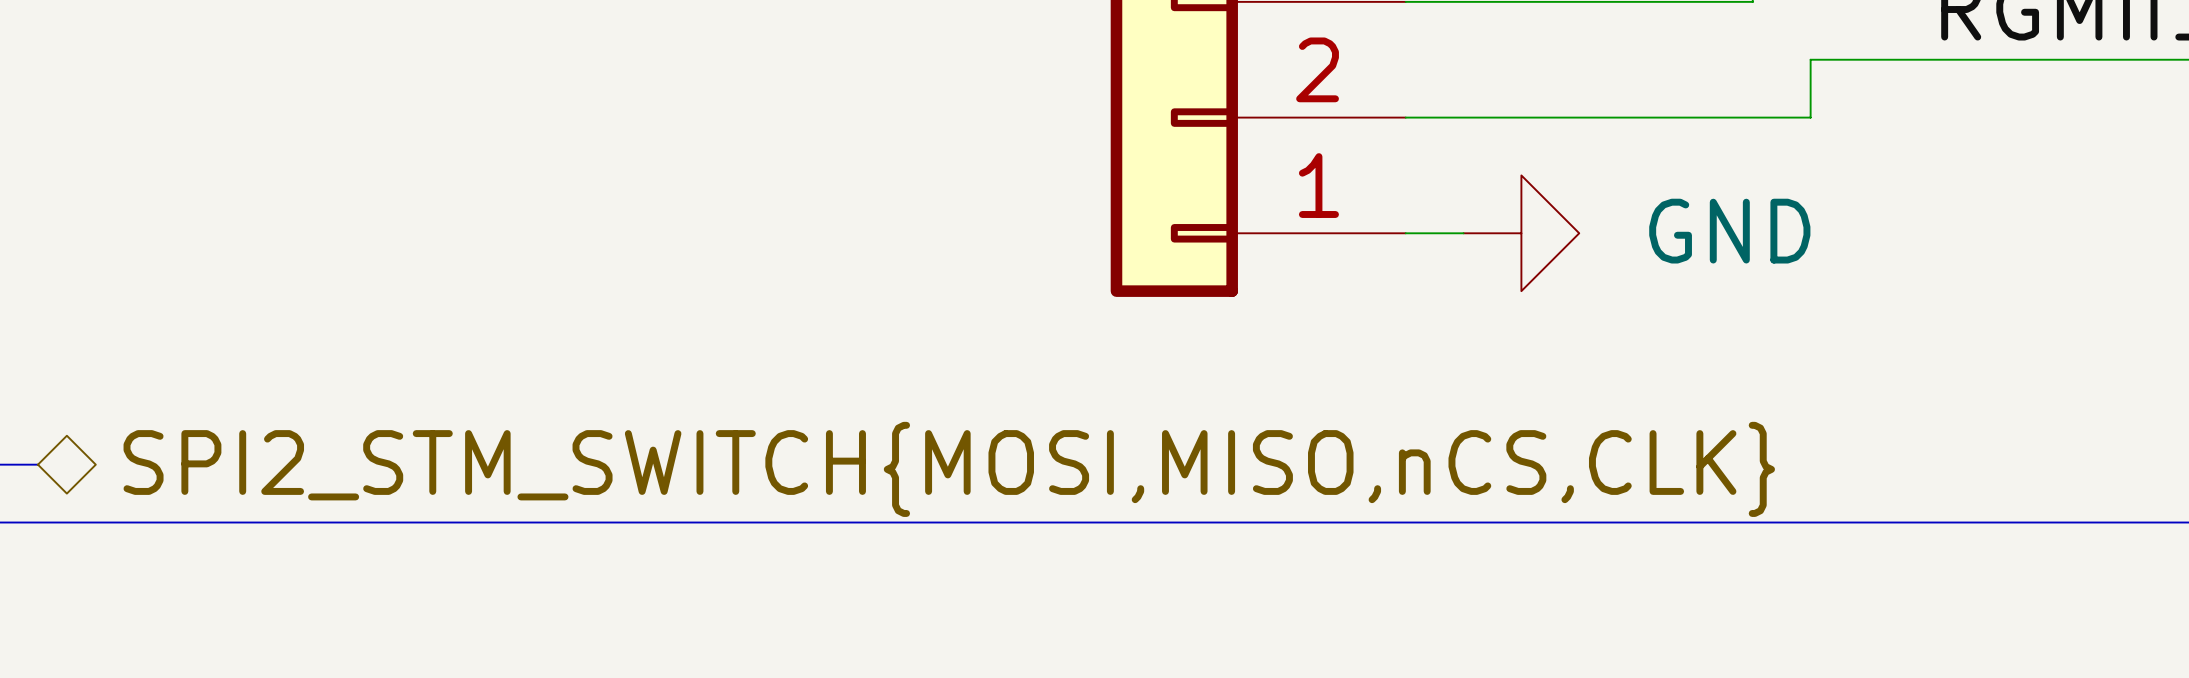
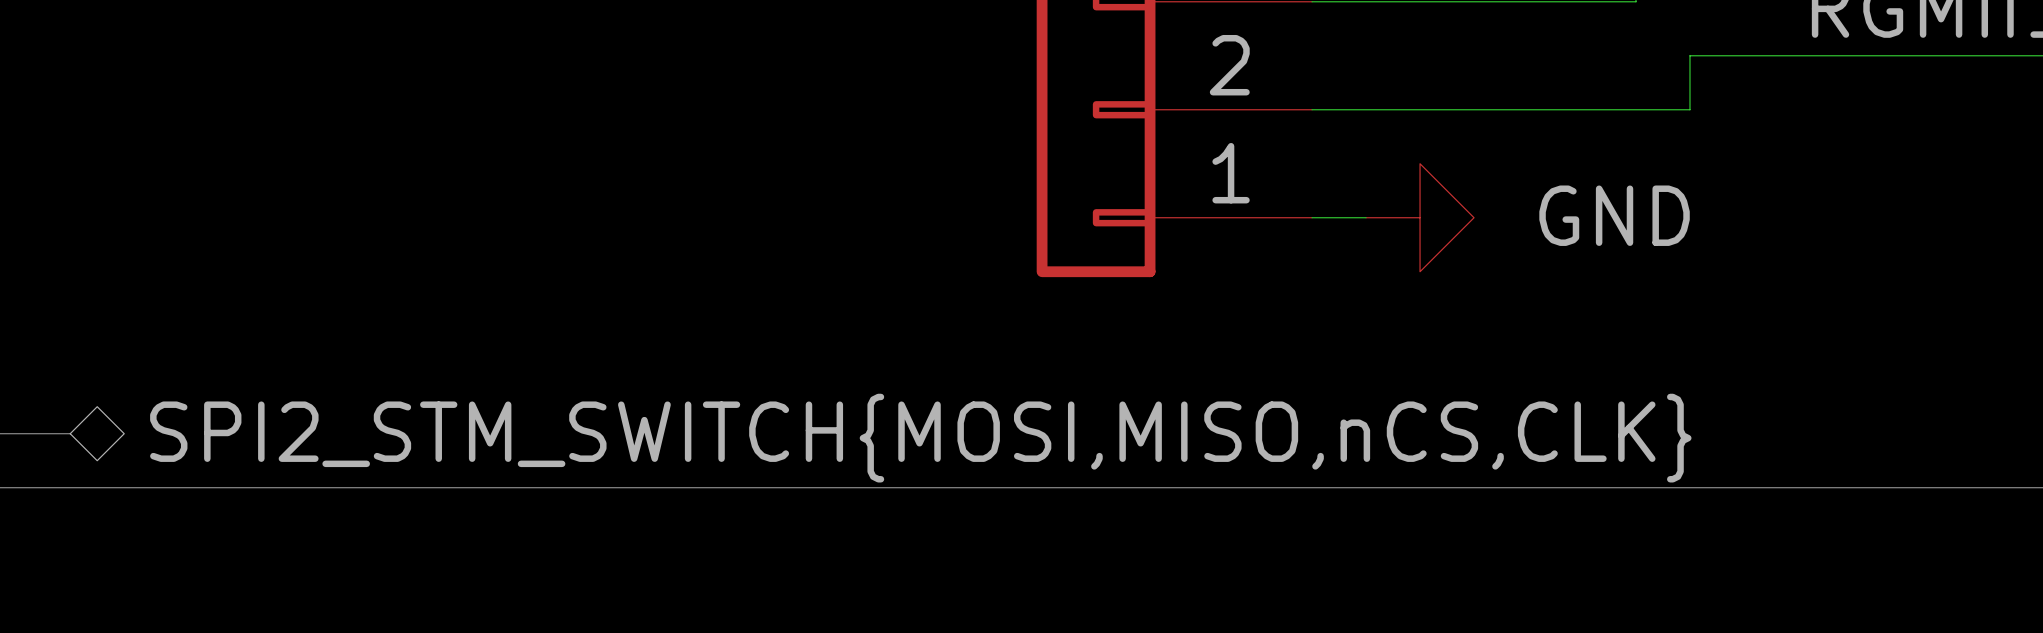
bus: none -> (35, 433) (70, 433)
hierarchical label position: SPI2_STM_SWITCH{MOSI,MISO,nCS,CLK} (949, 469) -> SPI2_STM_SWITCH{MOSI,MISO,nCS,CLK} (920, 438)

